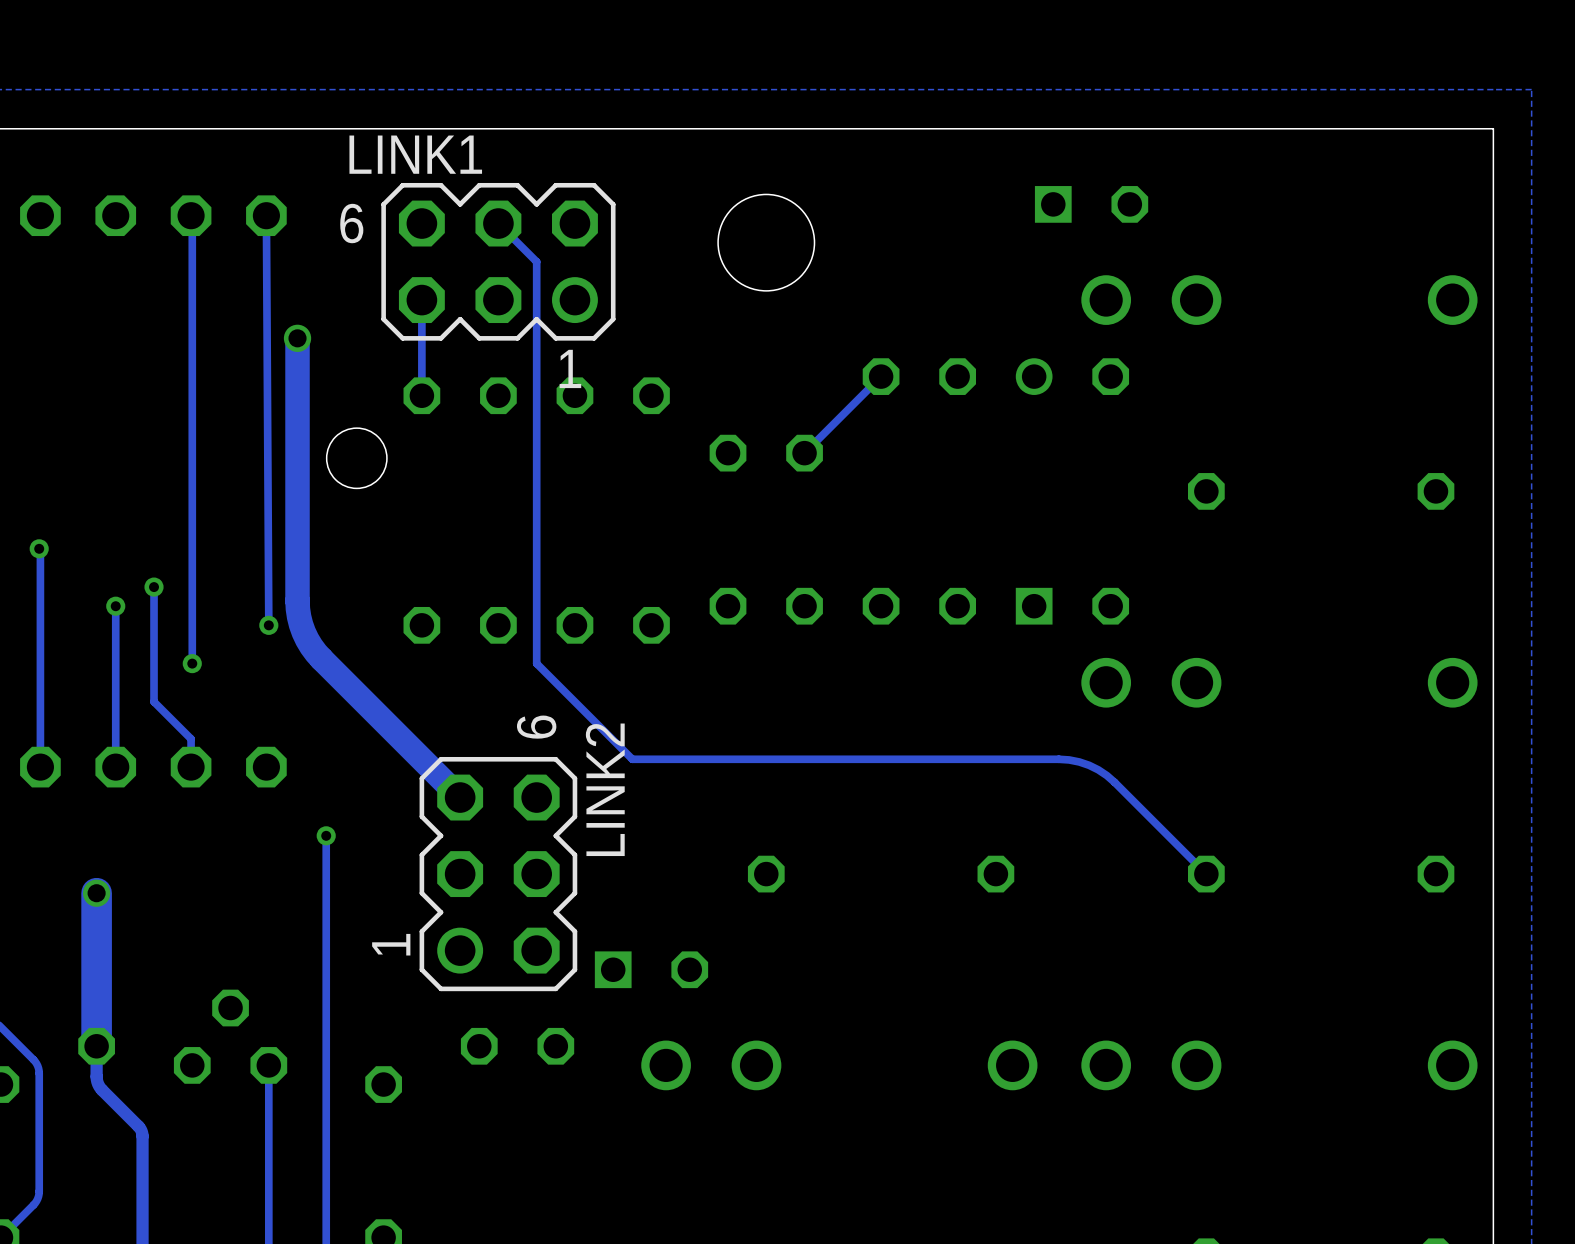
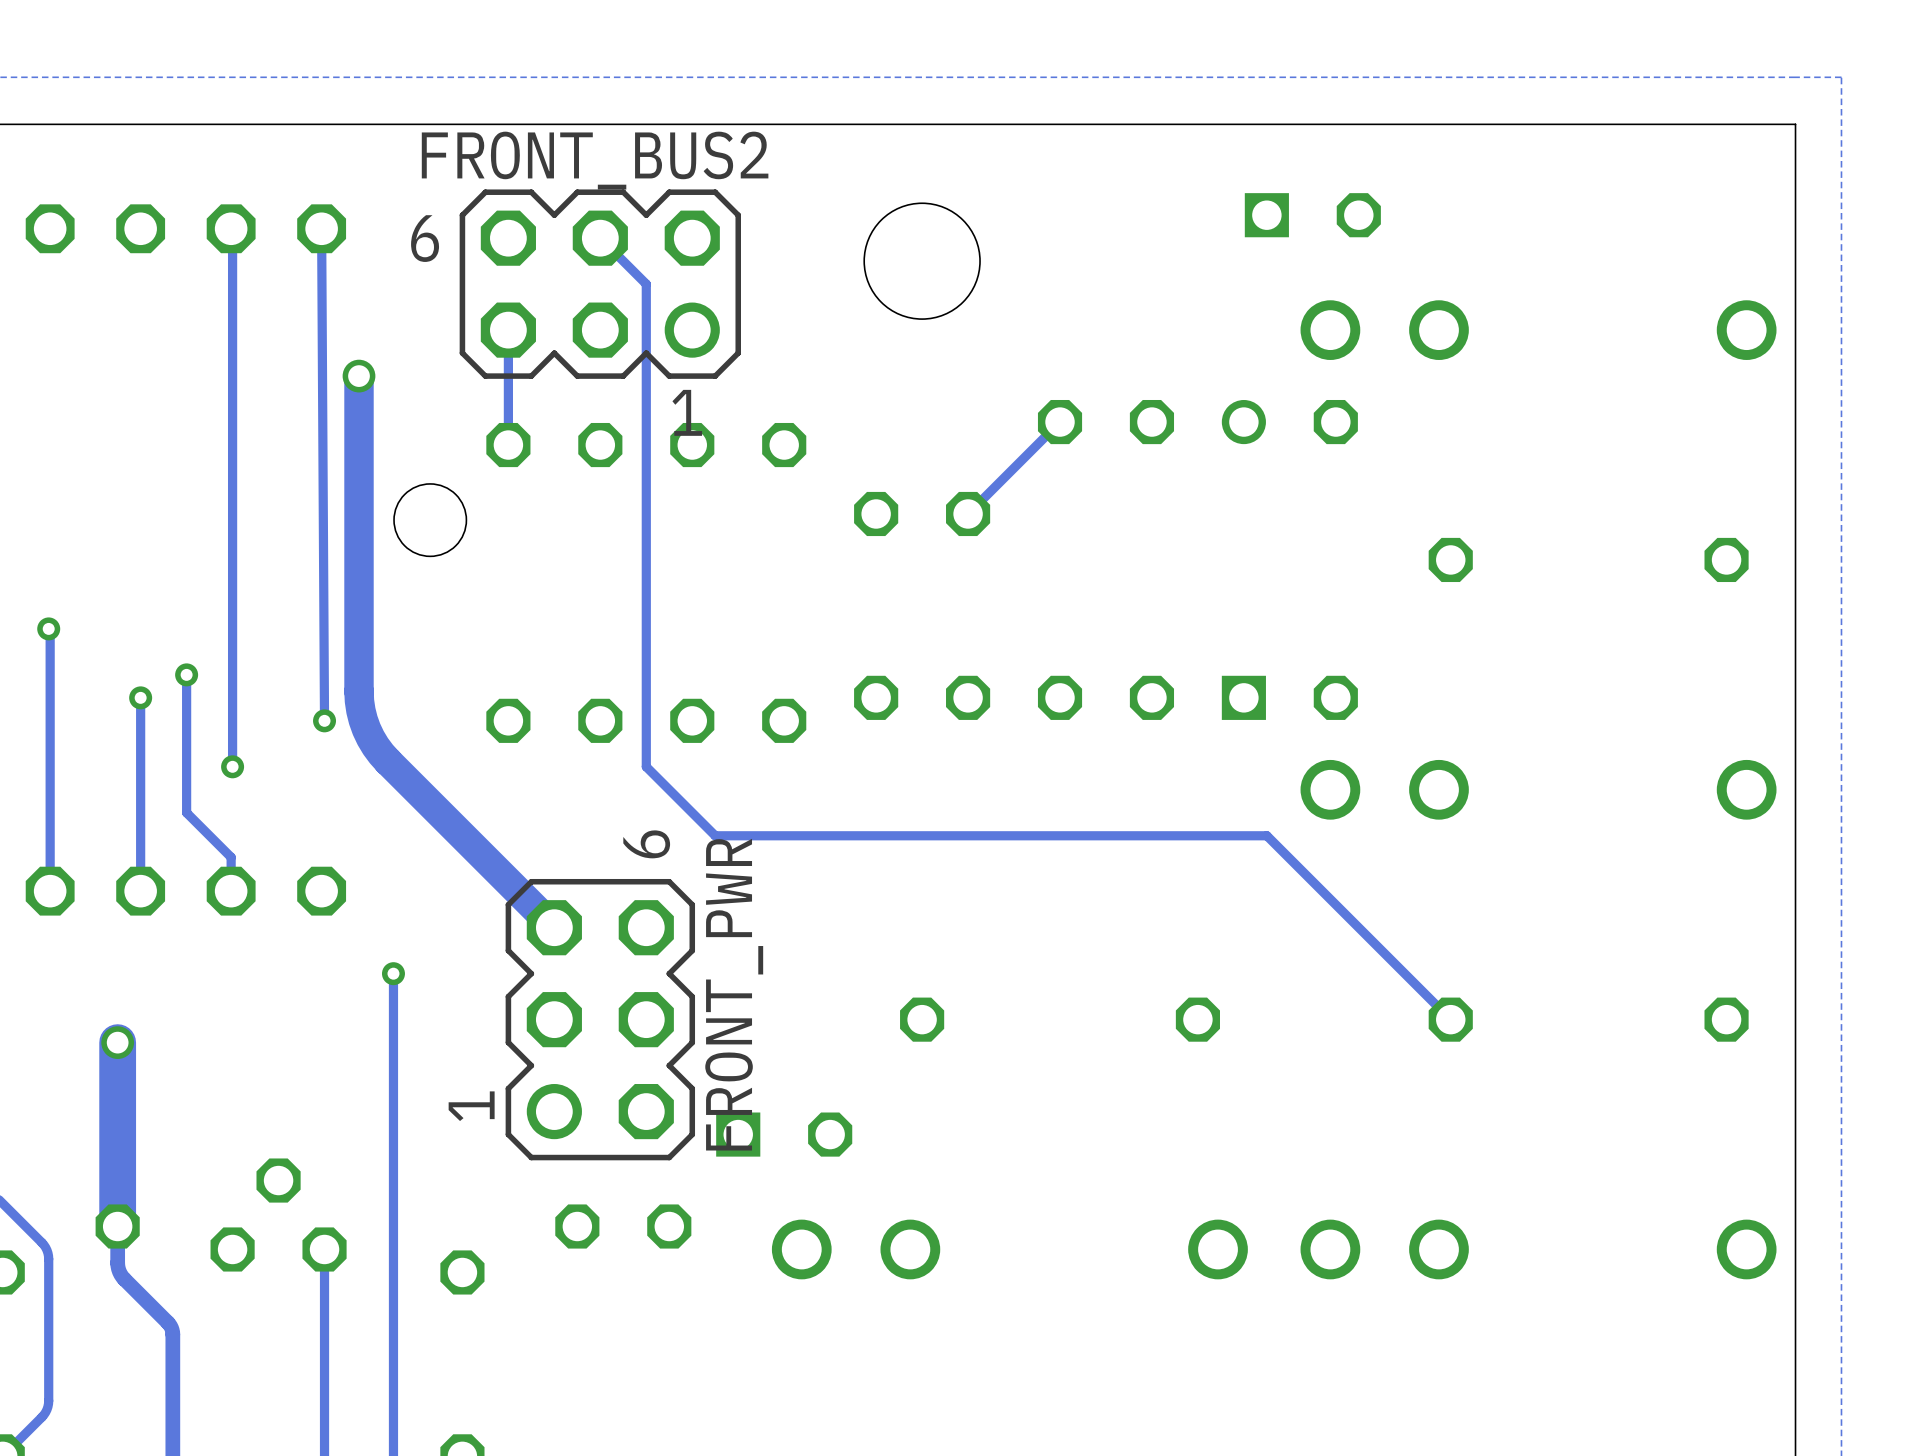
LINK1 name: LINK1 (415, 154) -> FRONT_BUS2 (595, 160)
track: (594, 721) (632, 759) (1058, 759) (1089, 765) (1114, 782) -> (715, 835) (1266, 835) (1340, 909)
LINK2 name: LINK2 (605, 789) -> FRONT_PWR (734, 994)

